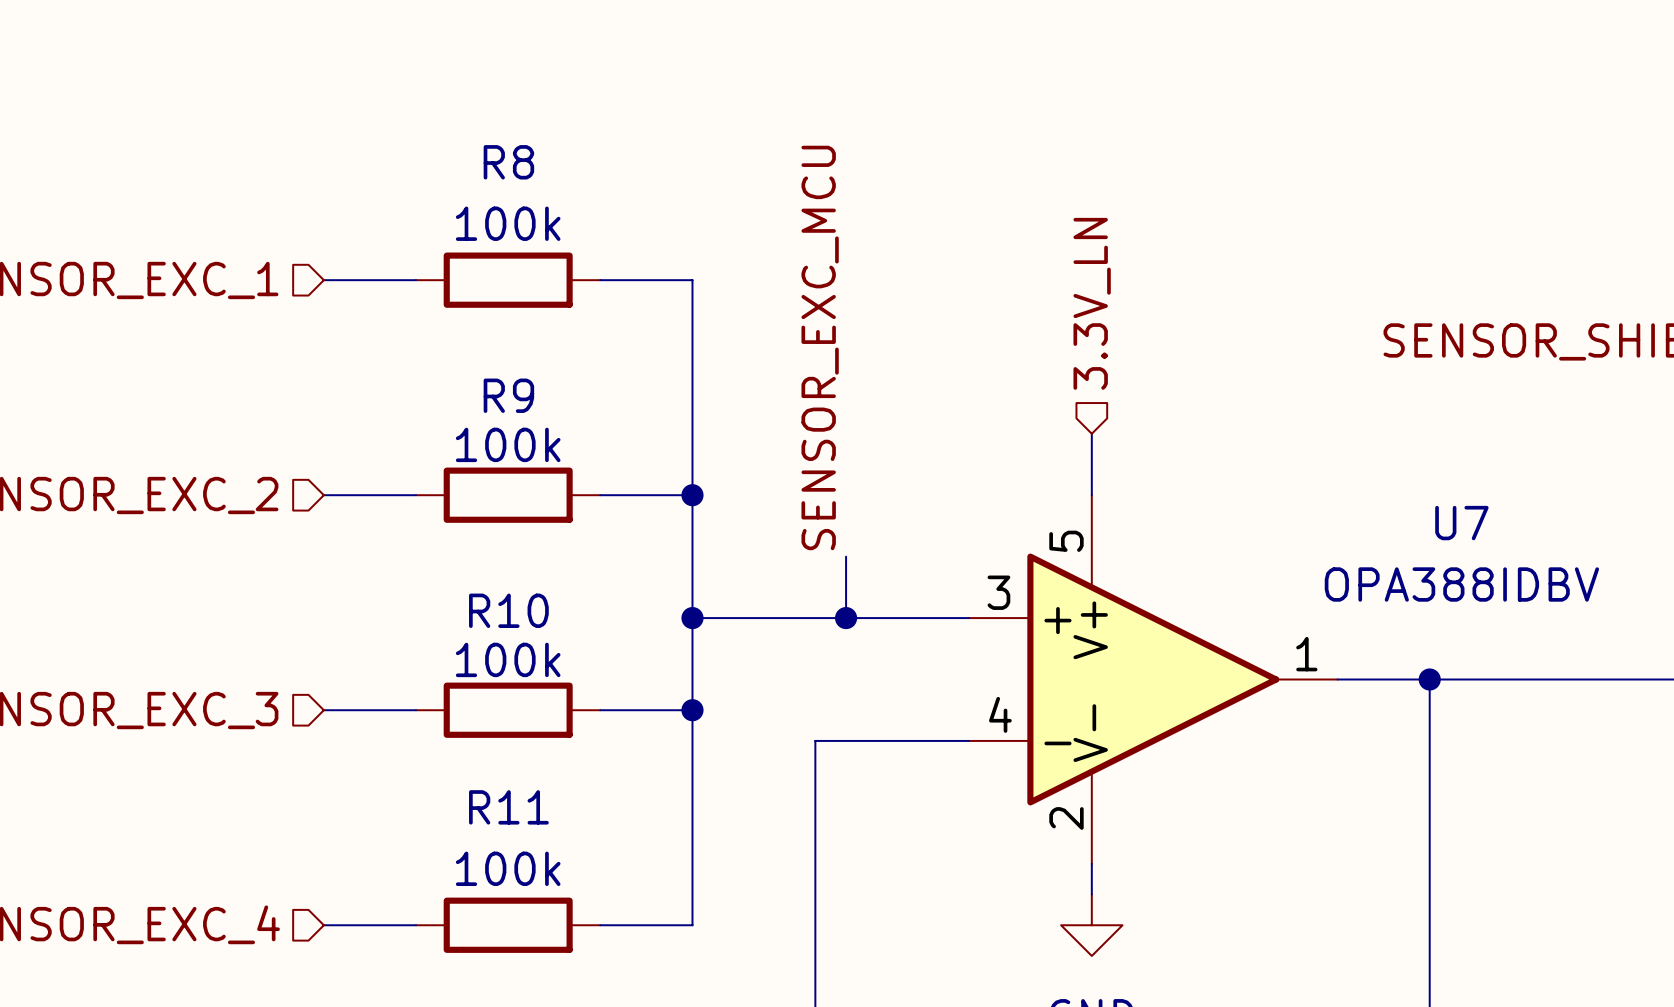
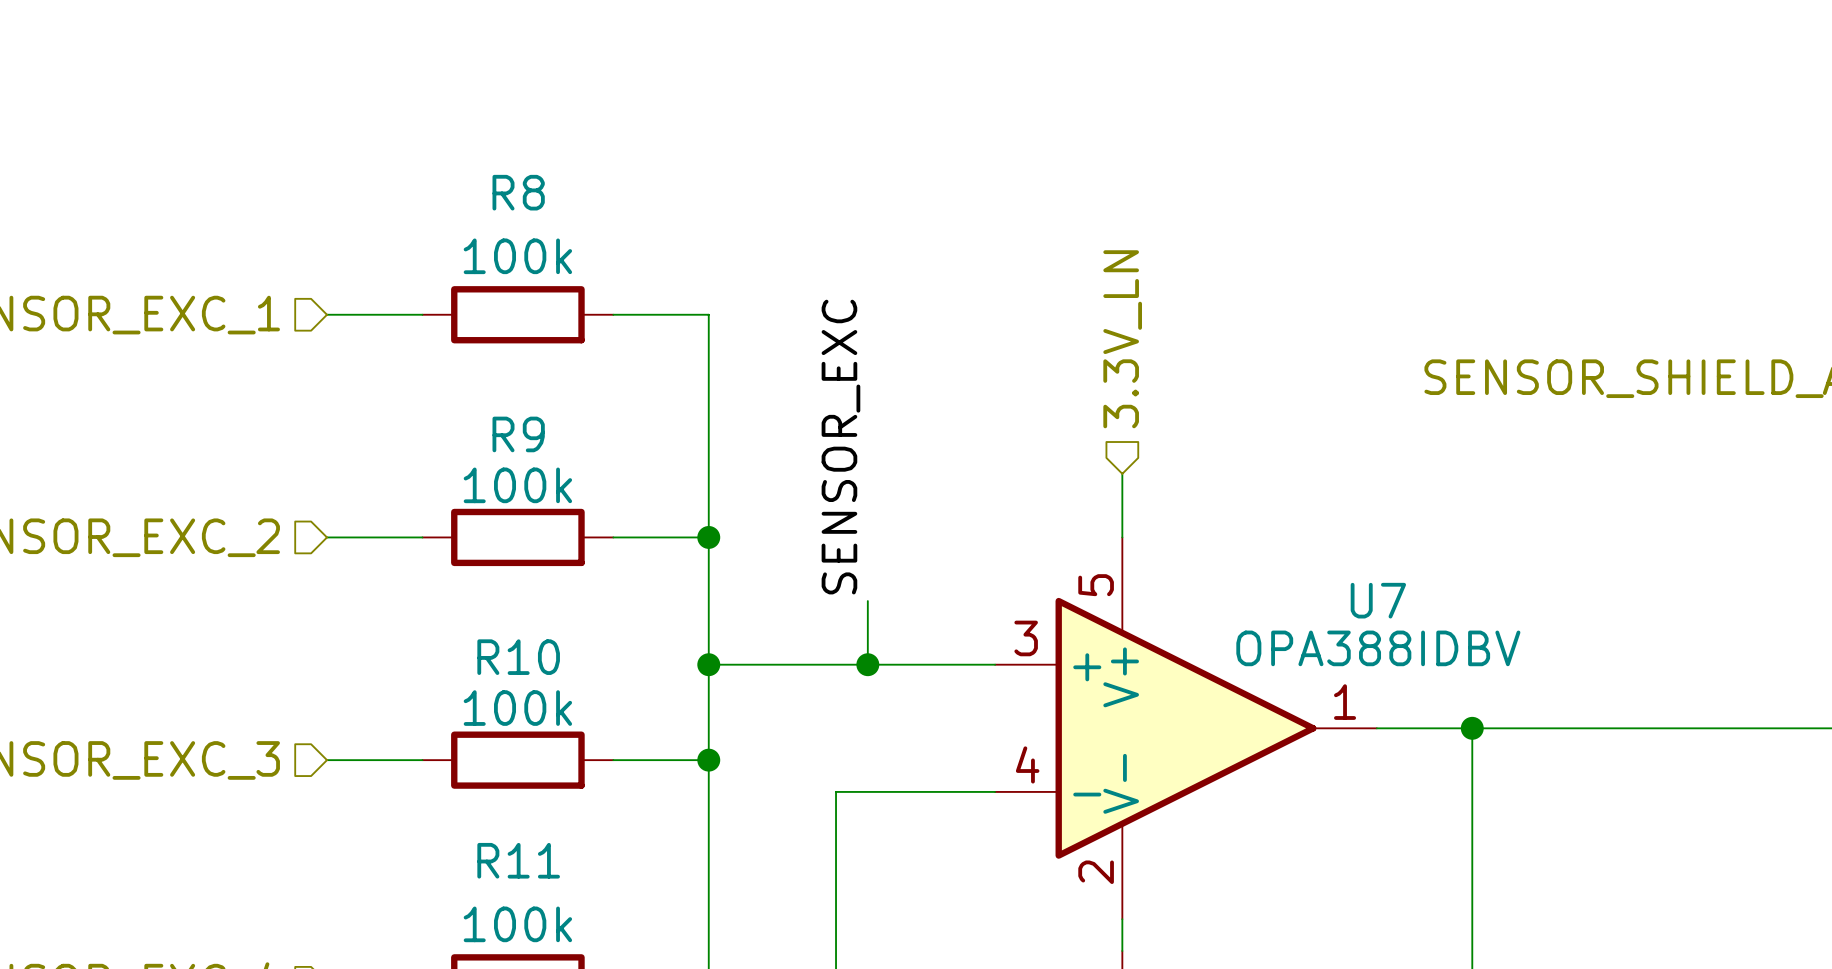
label: SENSOR_EXC_MCU (820, 347) -> SENSOR_EXC (840, 447)
U7 name position: U7 (1461, 523) -> U7 (1378, 600)
U7 value position: OPA388IDBV (1461, 584) -> OPA388IDBV (1378, 648)

